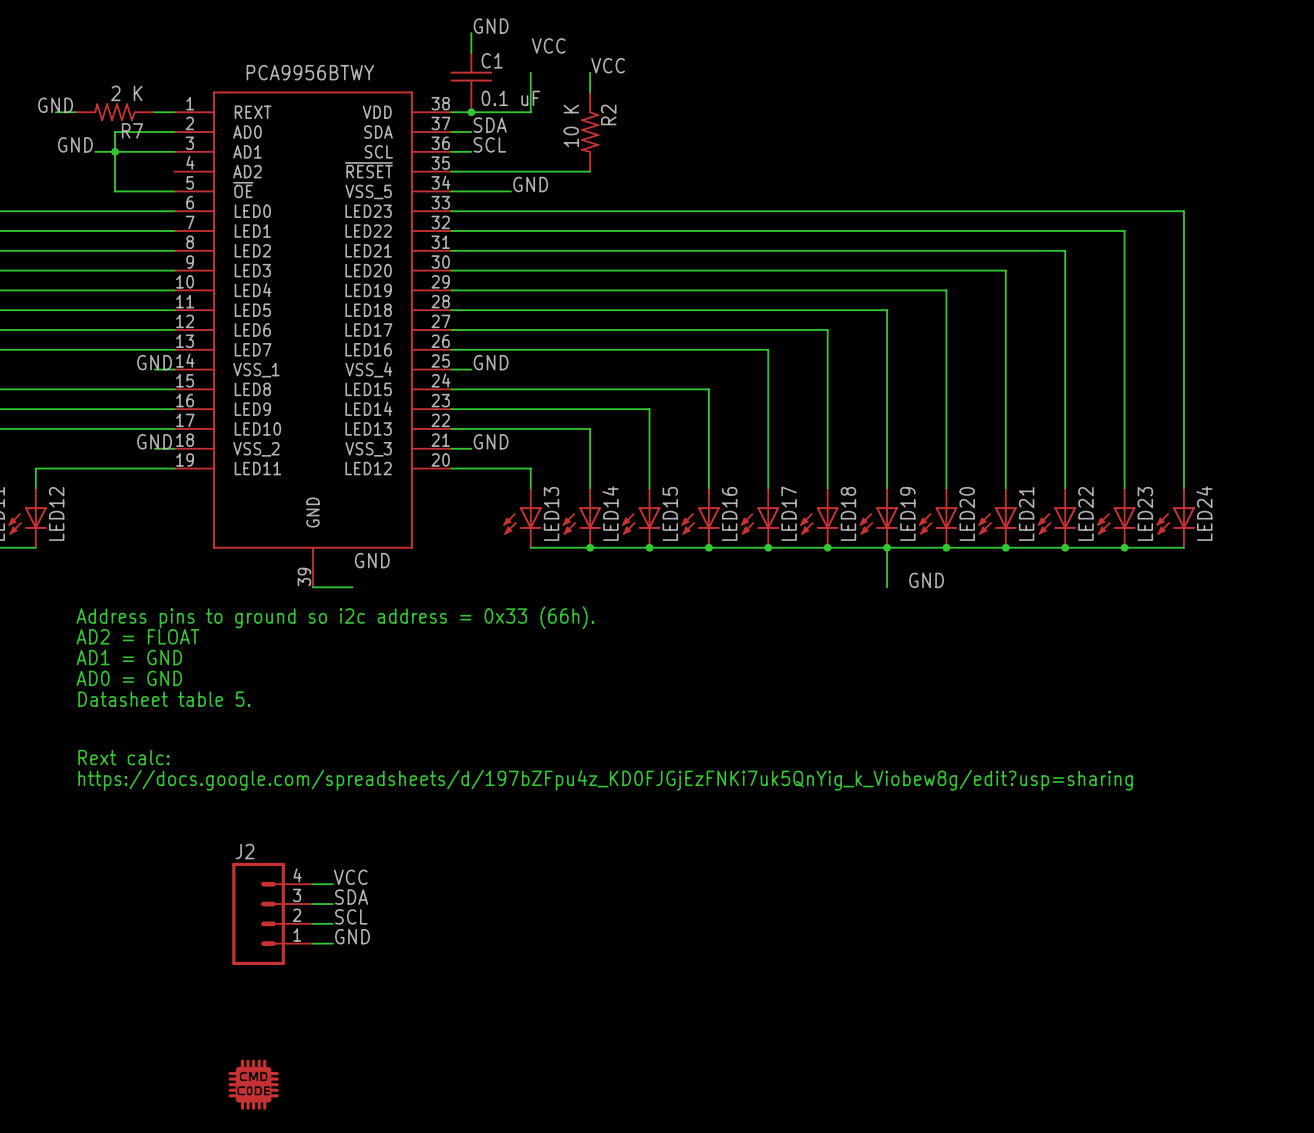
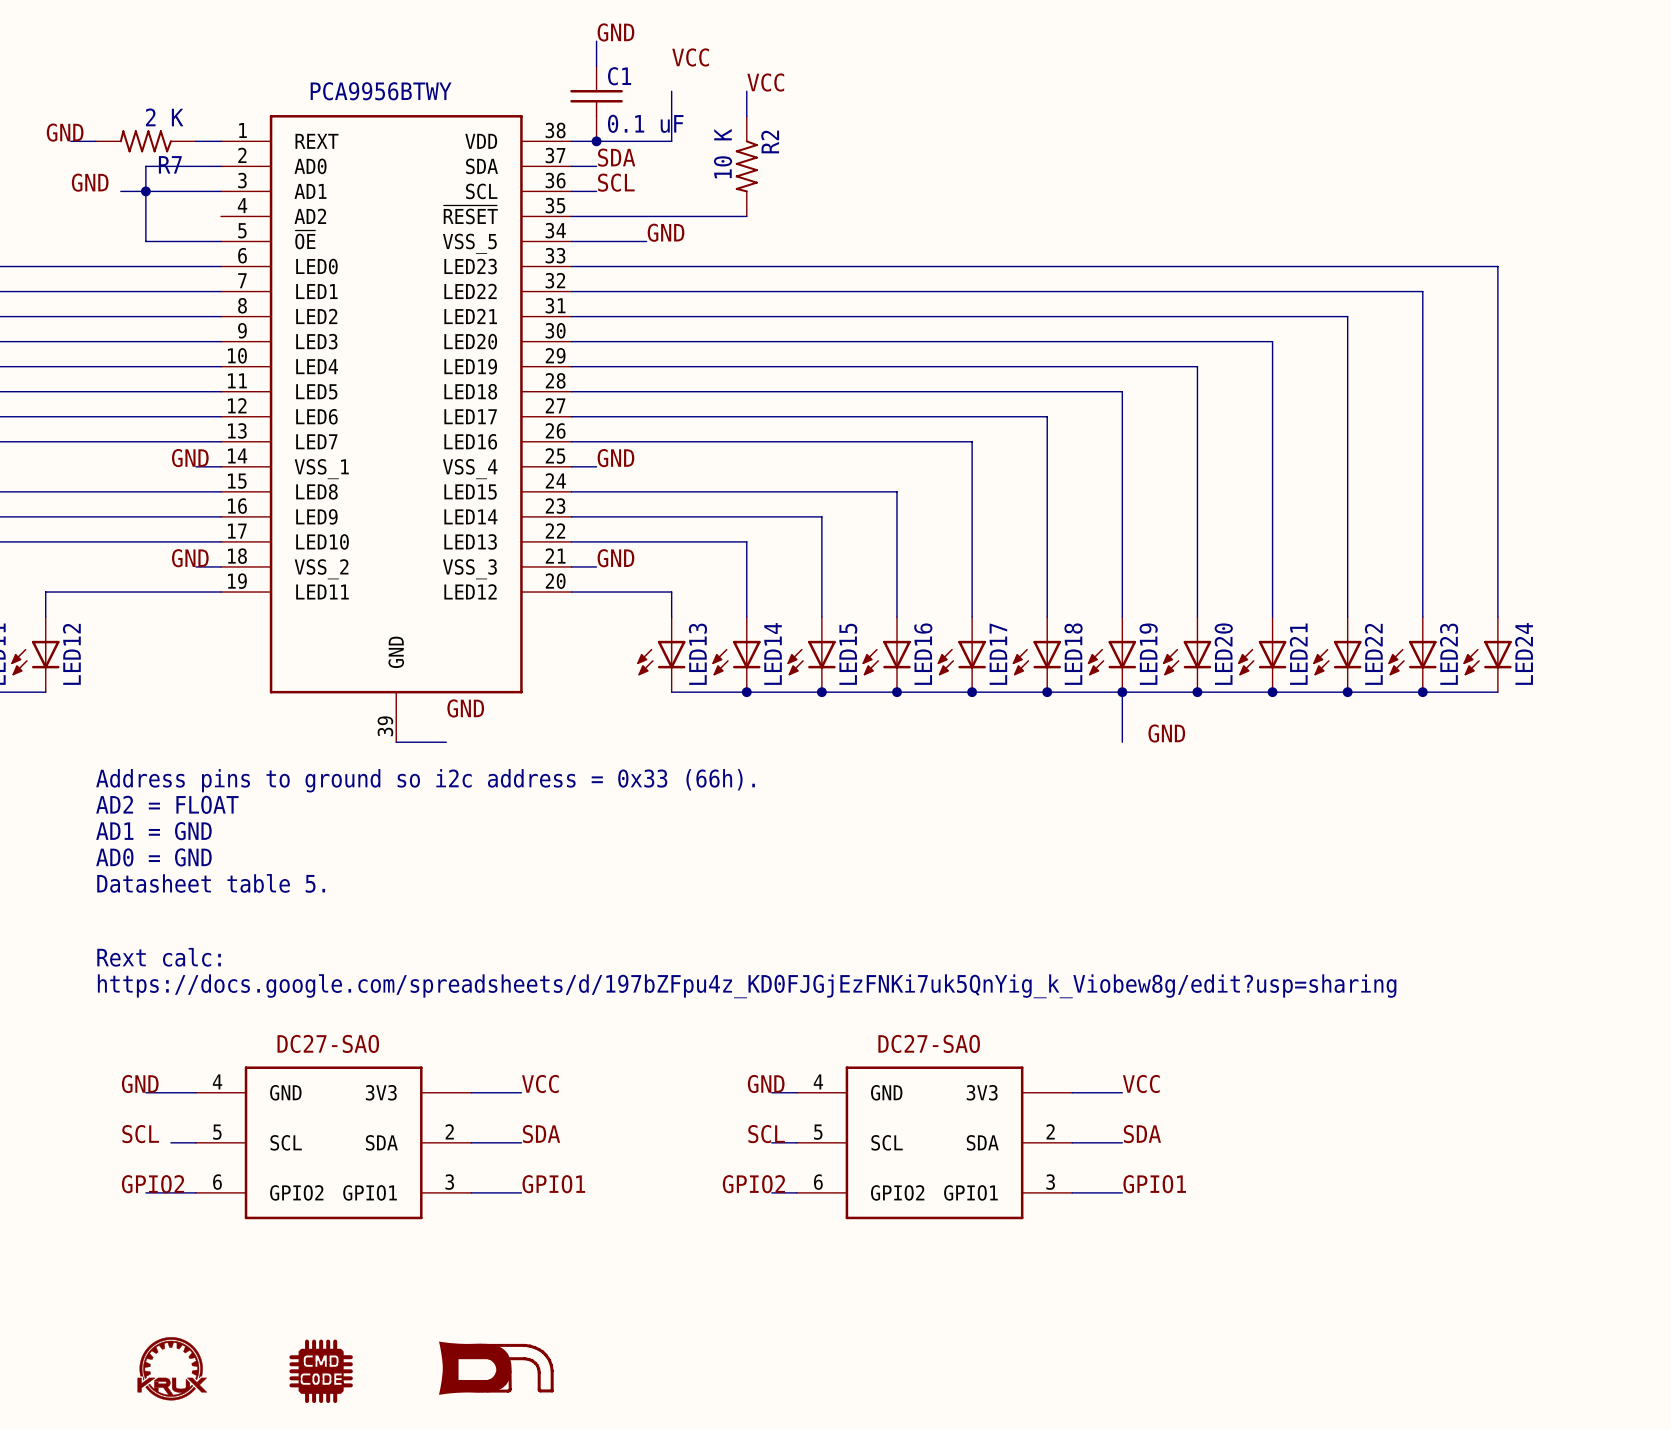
label: none -> GND (140, 1084)
label: none -> GND (766, 1084)
label: none -> VCC (1141, 1084)
wire: none -> (145, 1092) (195, 1092)
wire: none -> (471, 1092) (521, 1092)
wire: none -> (771, 1092) (796, 1092)
wire: none -> (1072, 1092) (1122, 1092)
label position: VCC (350, 877) -> VCC (540, 1084)
wire: (313, 884) (332, 884) -> none
label: none -> SCL (140, 1134)
label position: SDA (351, 897) -> SDA (541, 1134)
label: none -> SCL (766, 1134)
label: none -> SDA (1142, 1134)
part: none -> (333, 1142)
wire: (313, 904) (332, 904) -> (170, 1142) (195, 1142)
wire: none -> (471, 1142) (521, 1142)
wire: none -> (771, 1142) (796, 1142)
part: none -> (934, 1142)
wire: none -> (1072, 1142) (1122, 1142)
J2: (272, 913) -> none
label: SCL (351, 916) -> none
wire: (313, 923) (332, 923) -> none
label: none -> GPIO2 (153, 1184)
label: GND (352, 936) -> none
label: none -> GPIO1 (553, 1184)
label: none -> GPIO2 (753, 1184)
label: none -> GPIO1 (1154, 1184)
wire: none -> (145, 1192) (195, 1192)
wire: (313, 943) (332, 943) -> none
wire: none -> (471, 1192) (521, 1192)
wire: none -> (771, 1192) (796, 1192)
wire: none -> (1072, 1192) (1122, 1192)
part: none -> (172, 1368)
part: none -> (496, 1368)

